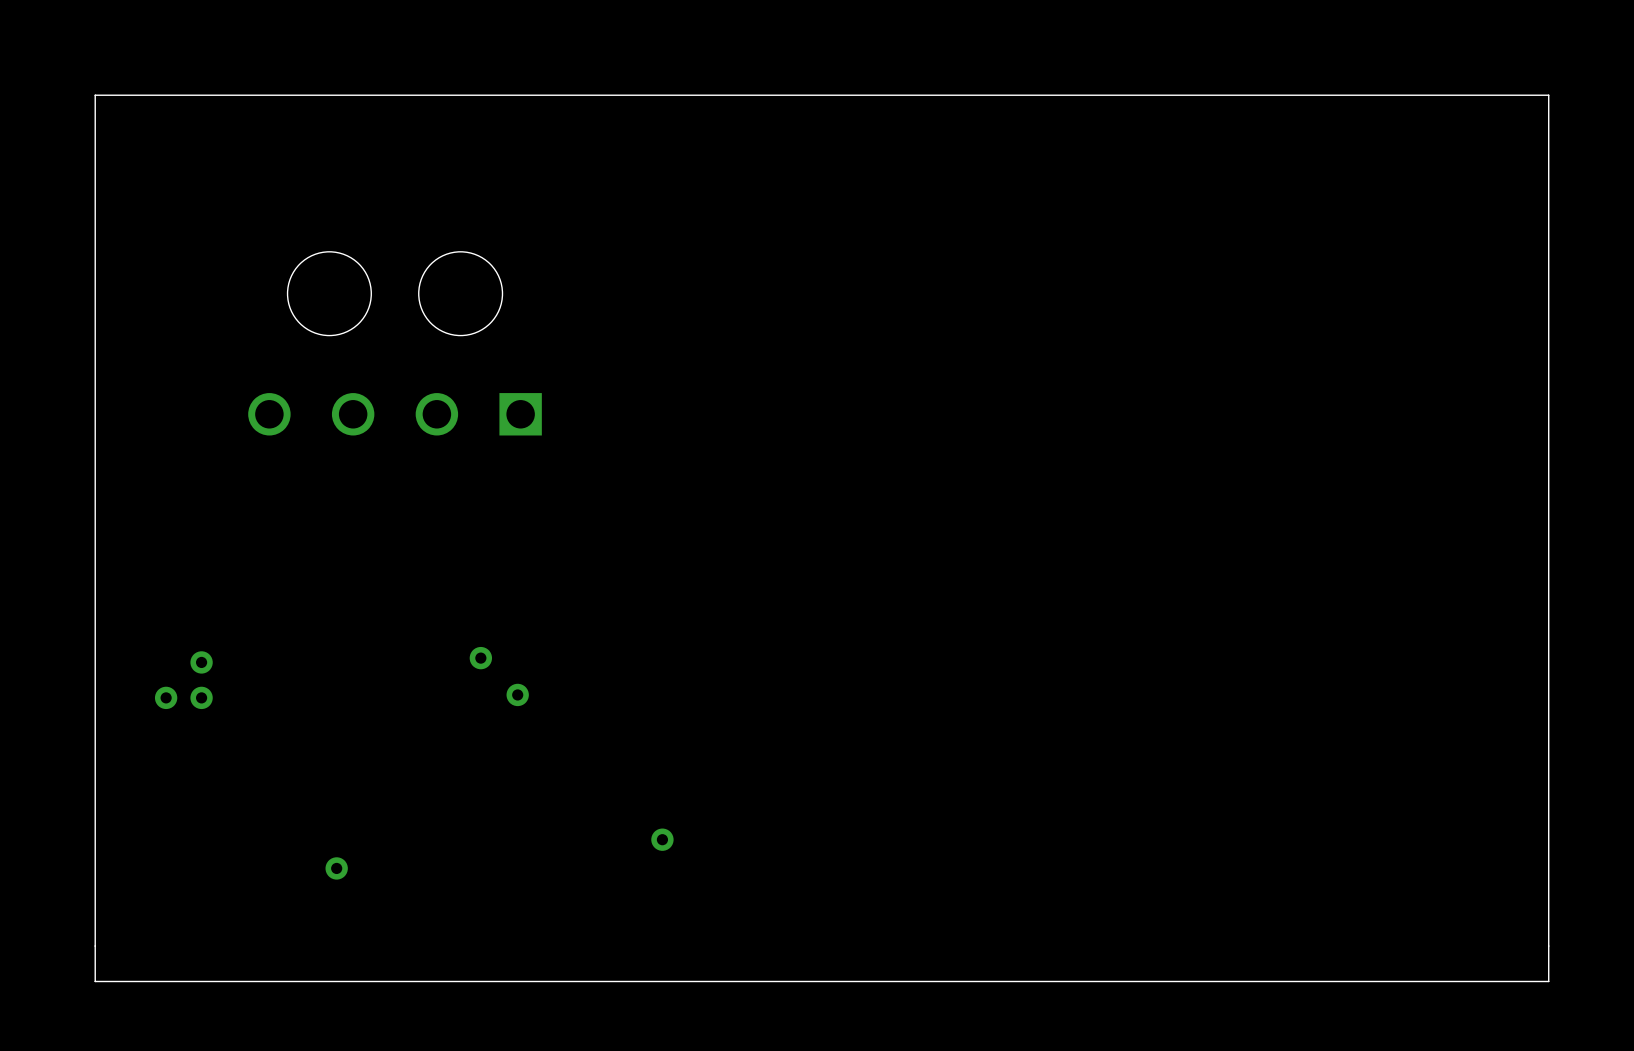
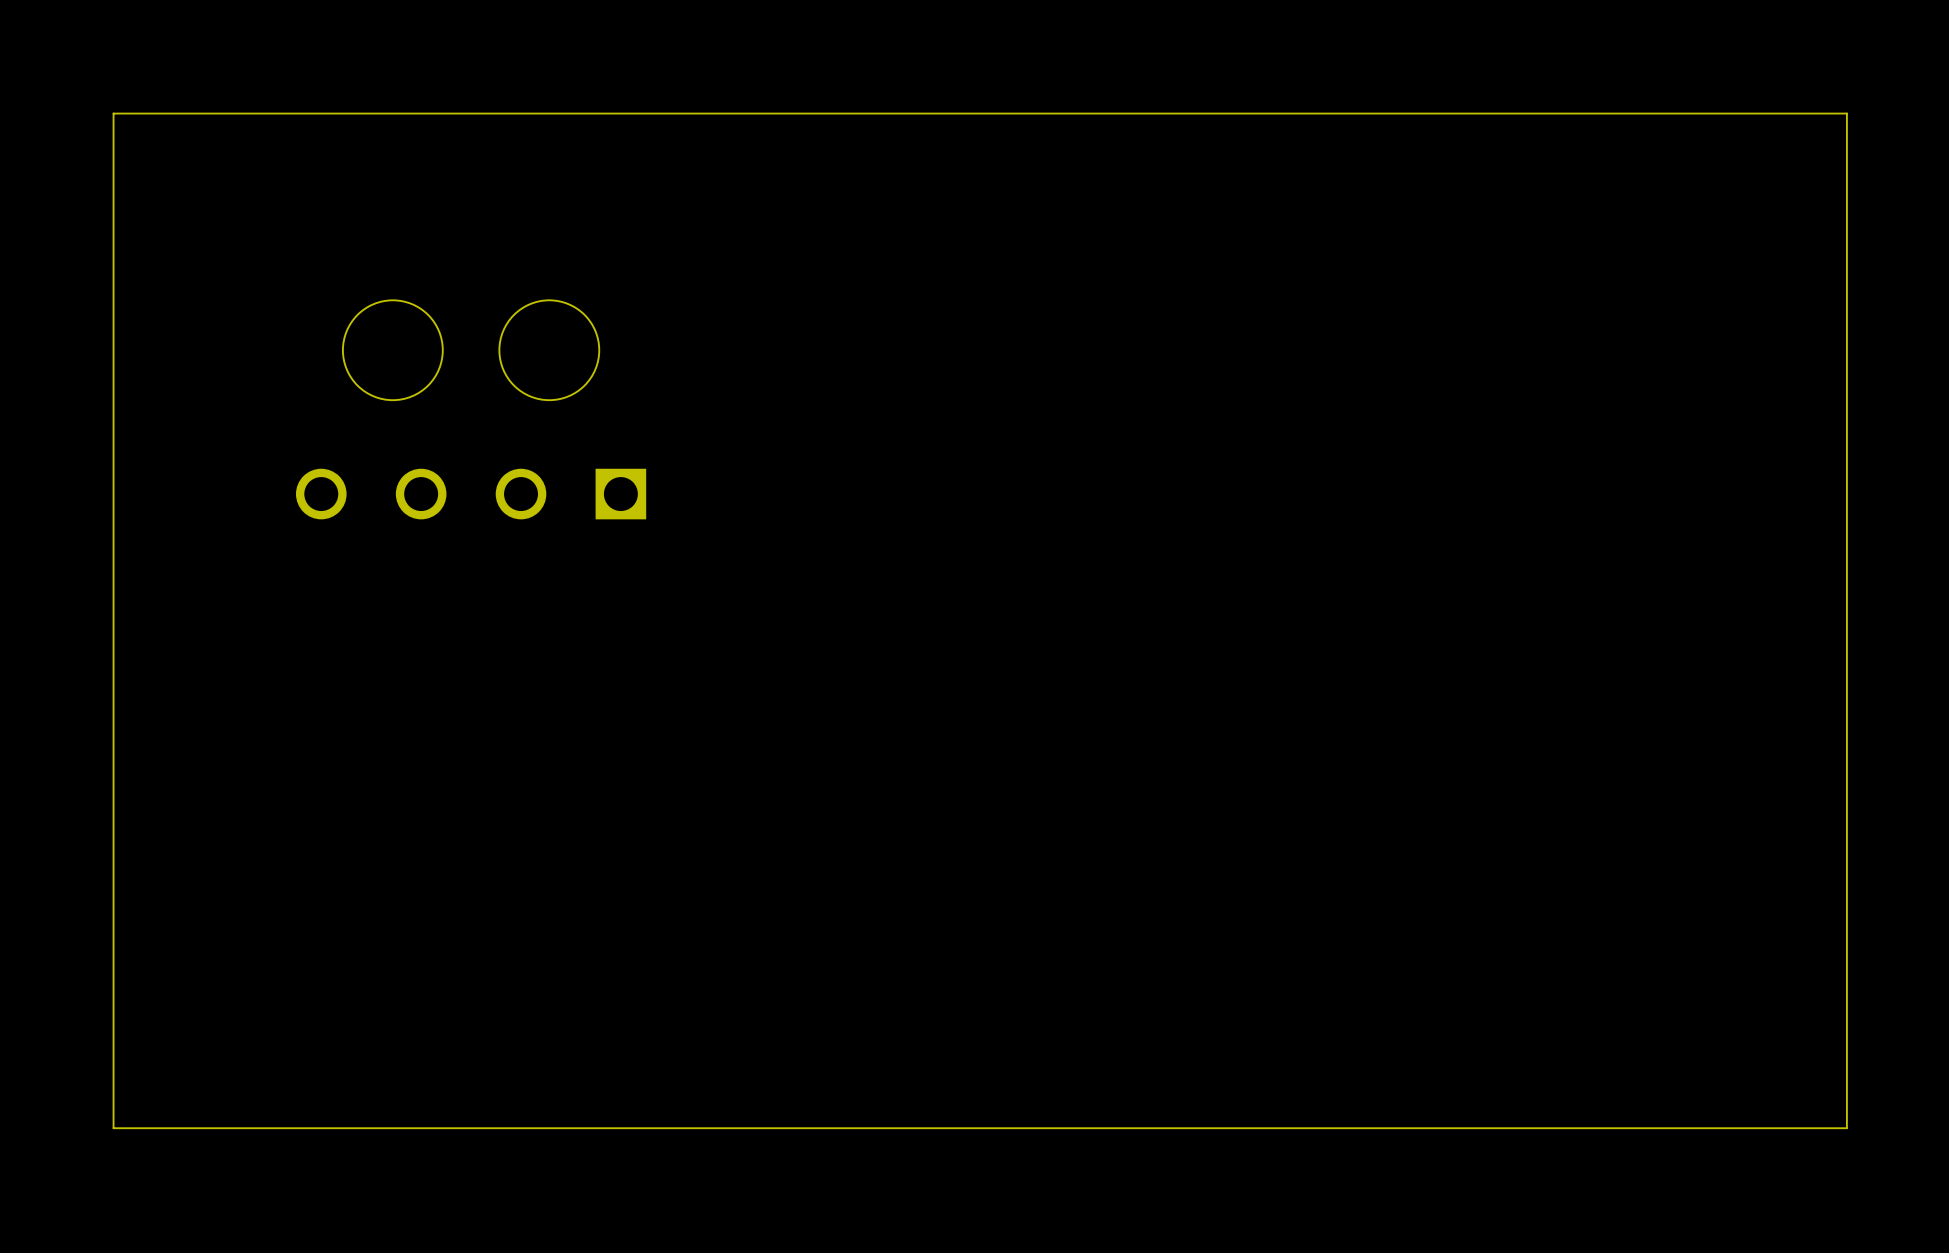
via: (480, 658) -> none
via: (201, 662) -> none
via: (517, 694) -> none
via: (166, 697) -> none
via: (201, 697) -> none
via: (662, 839) -> none
via: (336, 868) -> none
board edge: (1548, 946) (1548, 981) (95, 981) (95, 946) -> (1846, 1128) (113, 1128)

